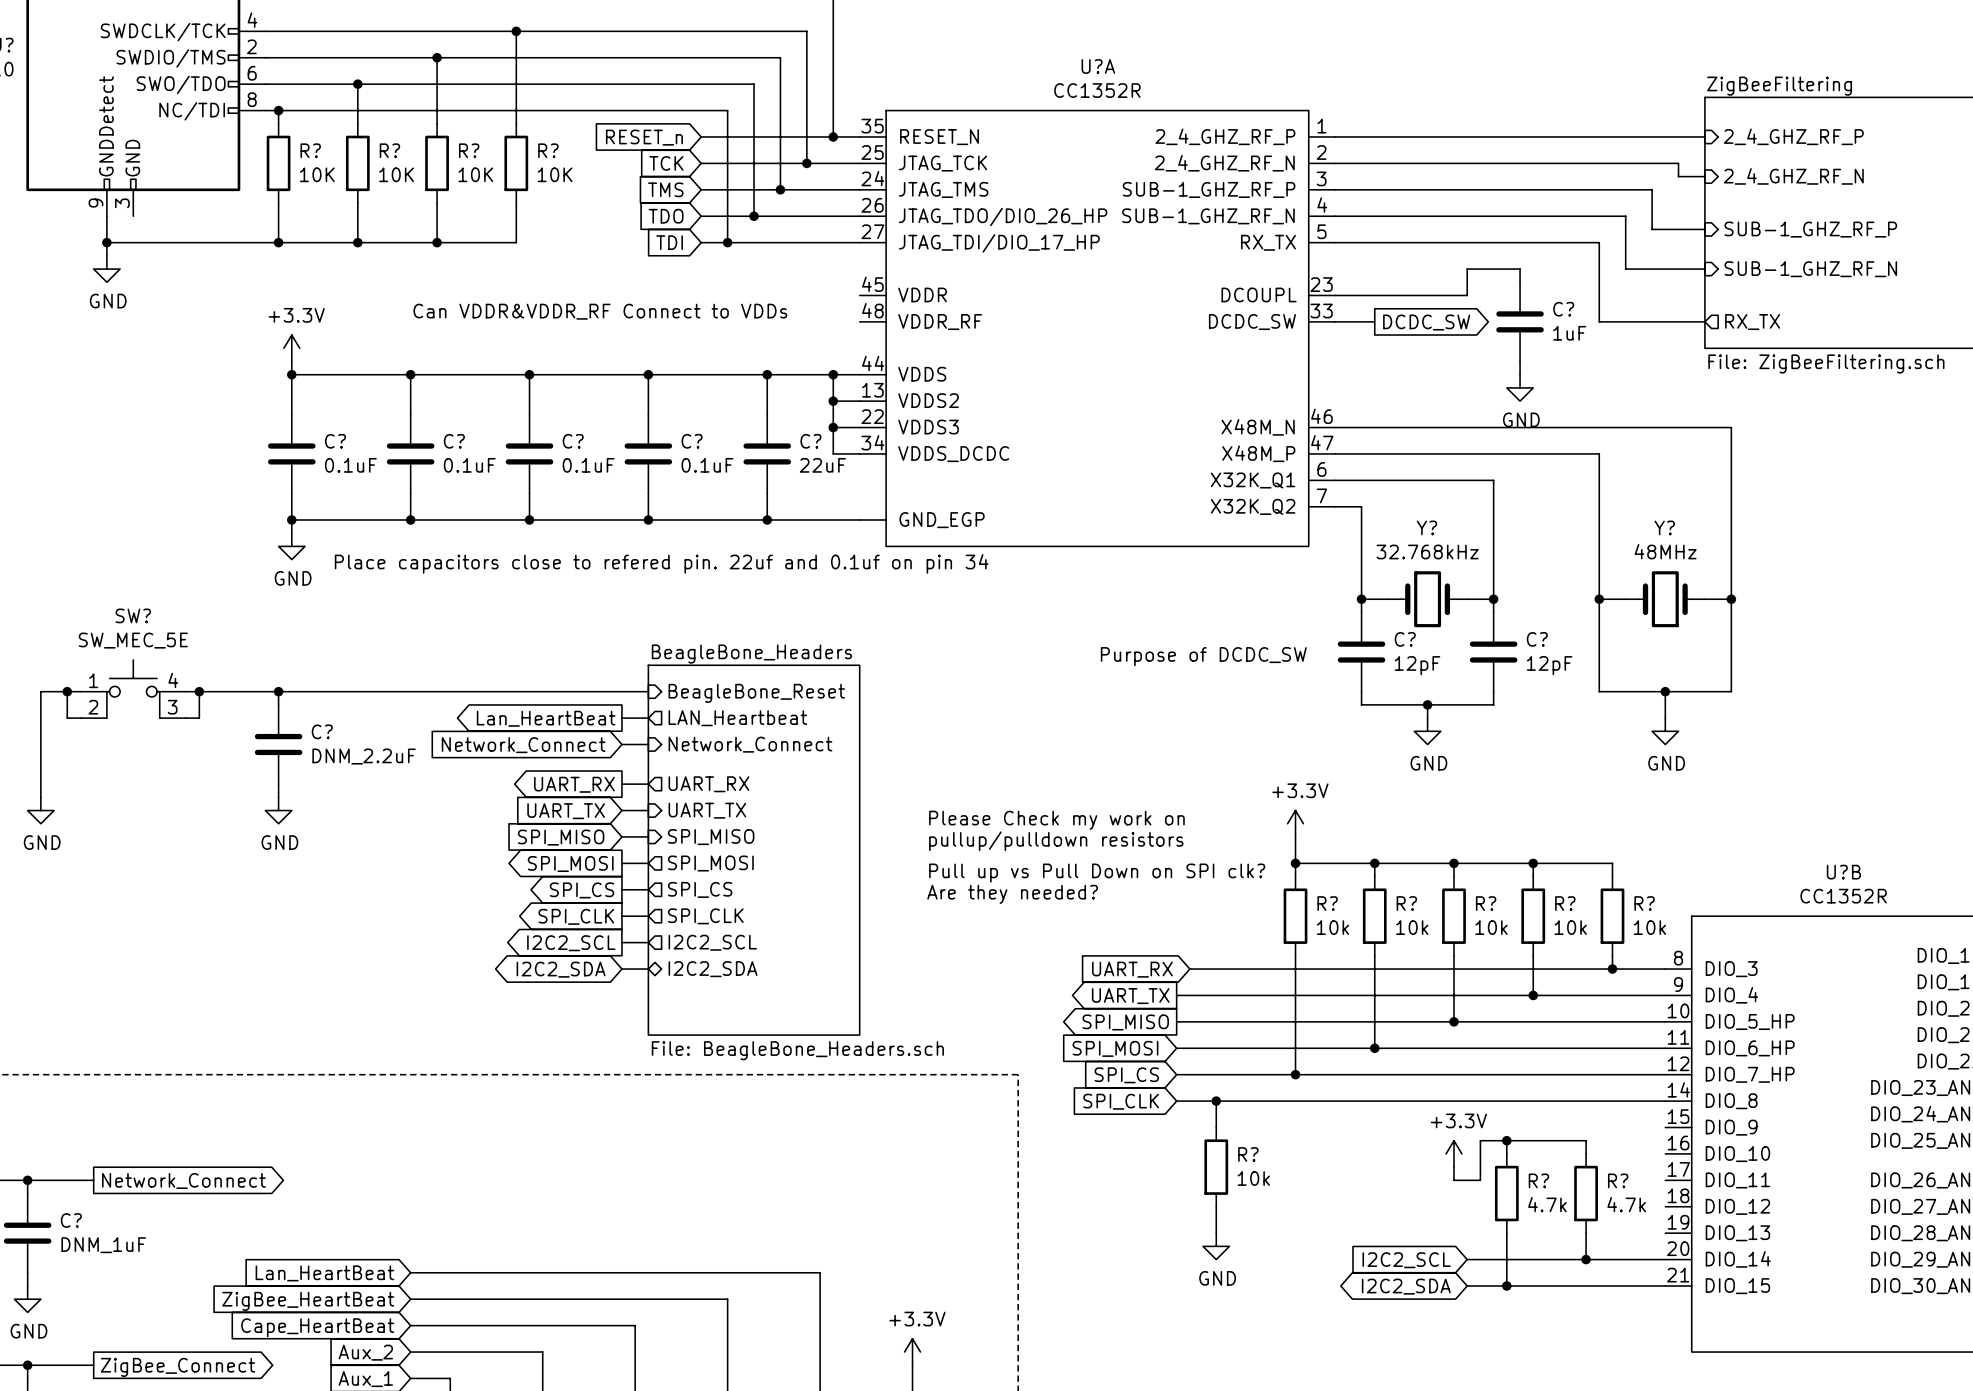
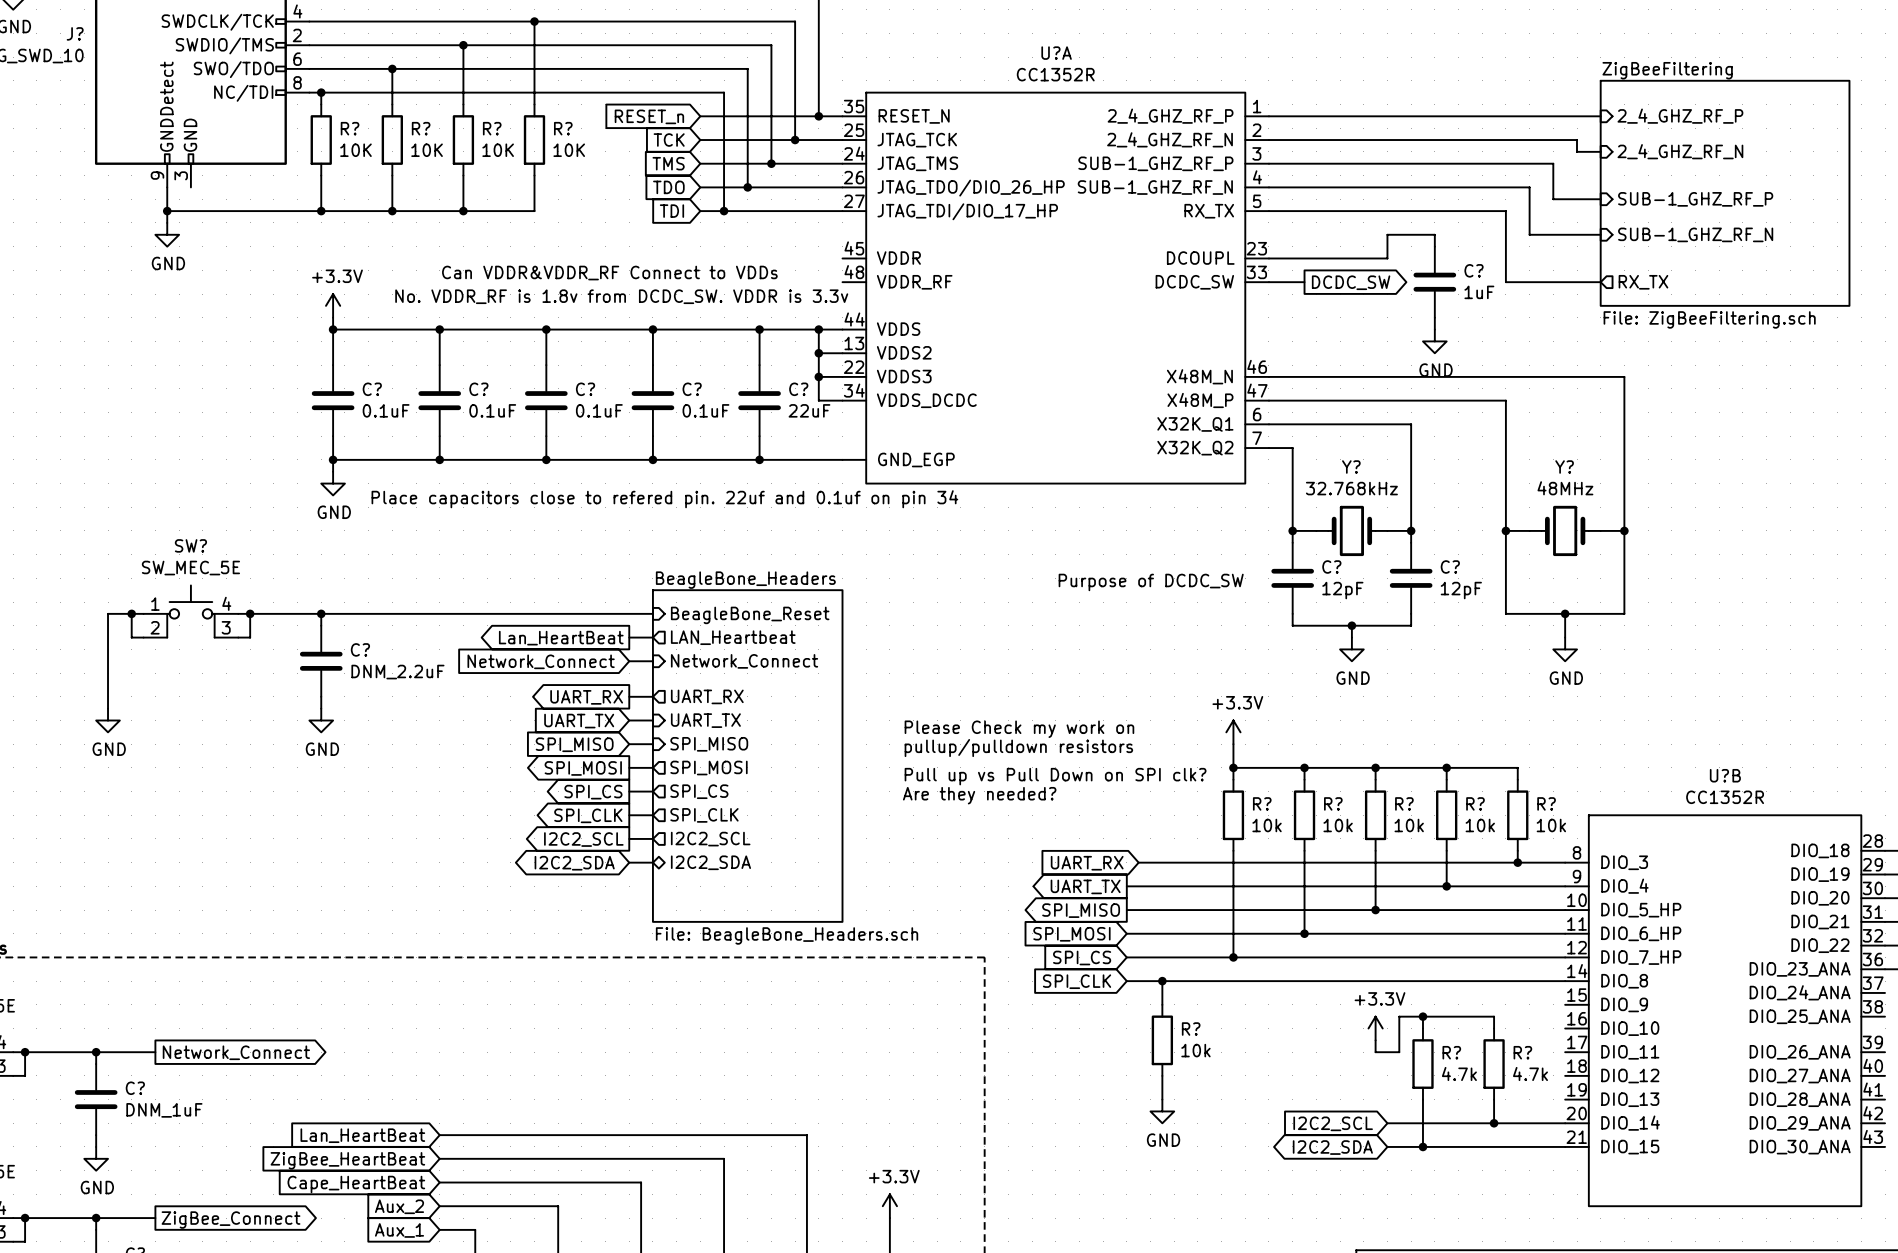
text: none -> No. VDDR_RF is 1.8v from DCDC_SW. VDDR is 3.3v (621, 296)

